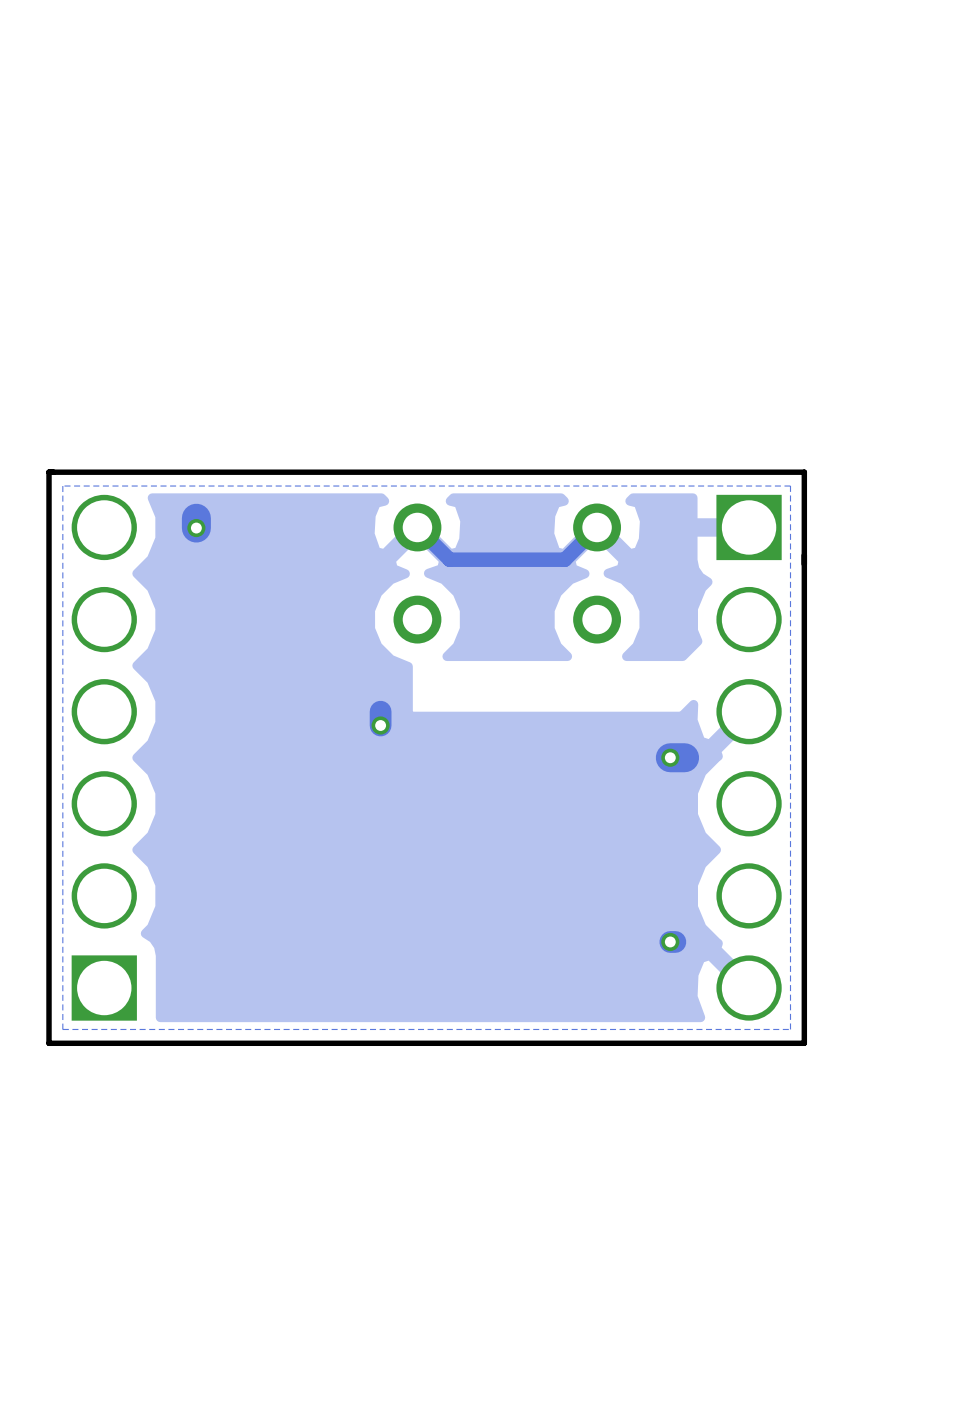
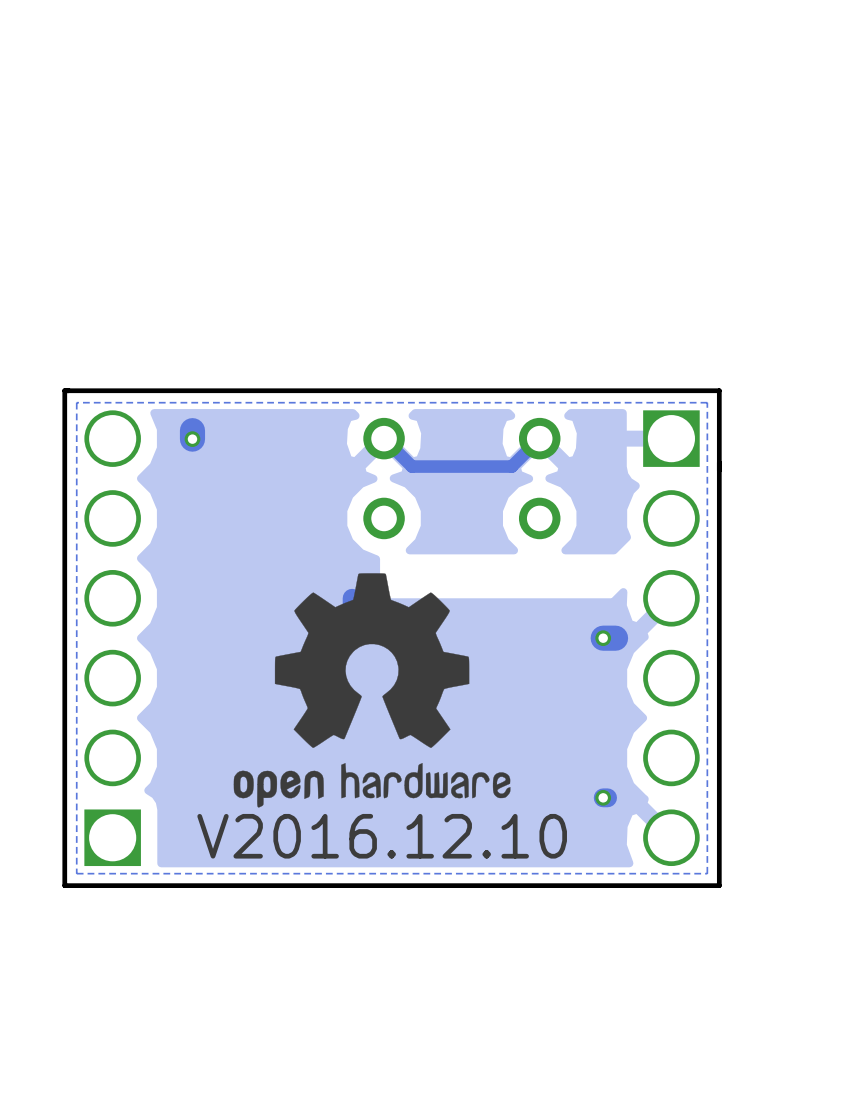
drawing: none -> [233, 573, 511, 808]
text: none -> V2016.12.10 (382, 836)

